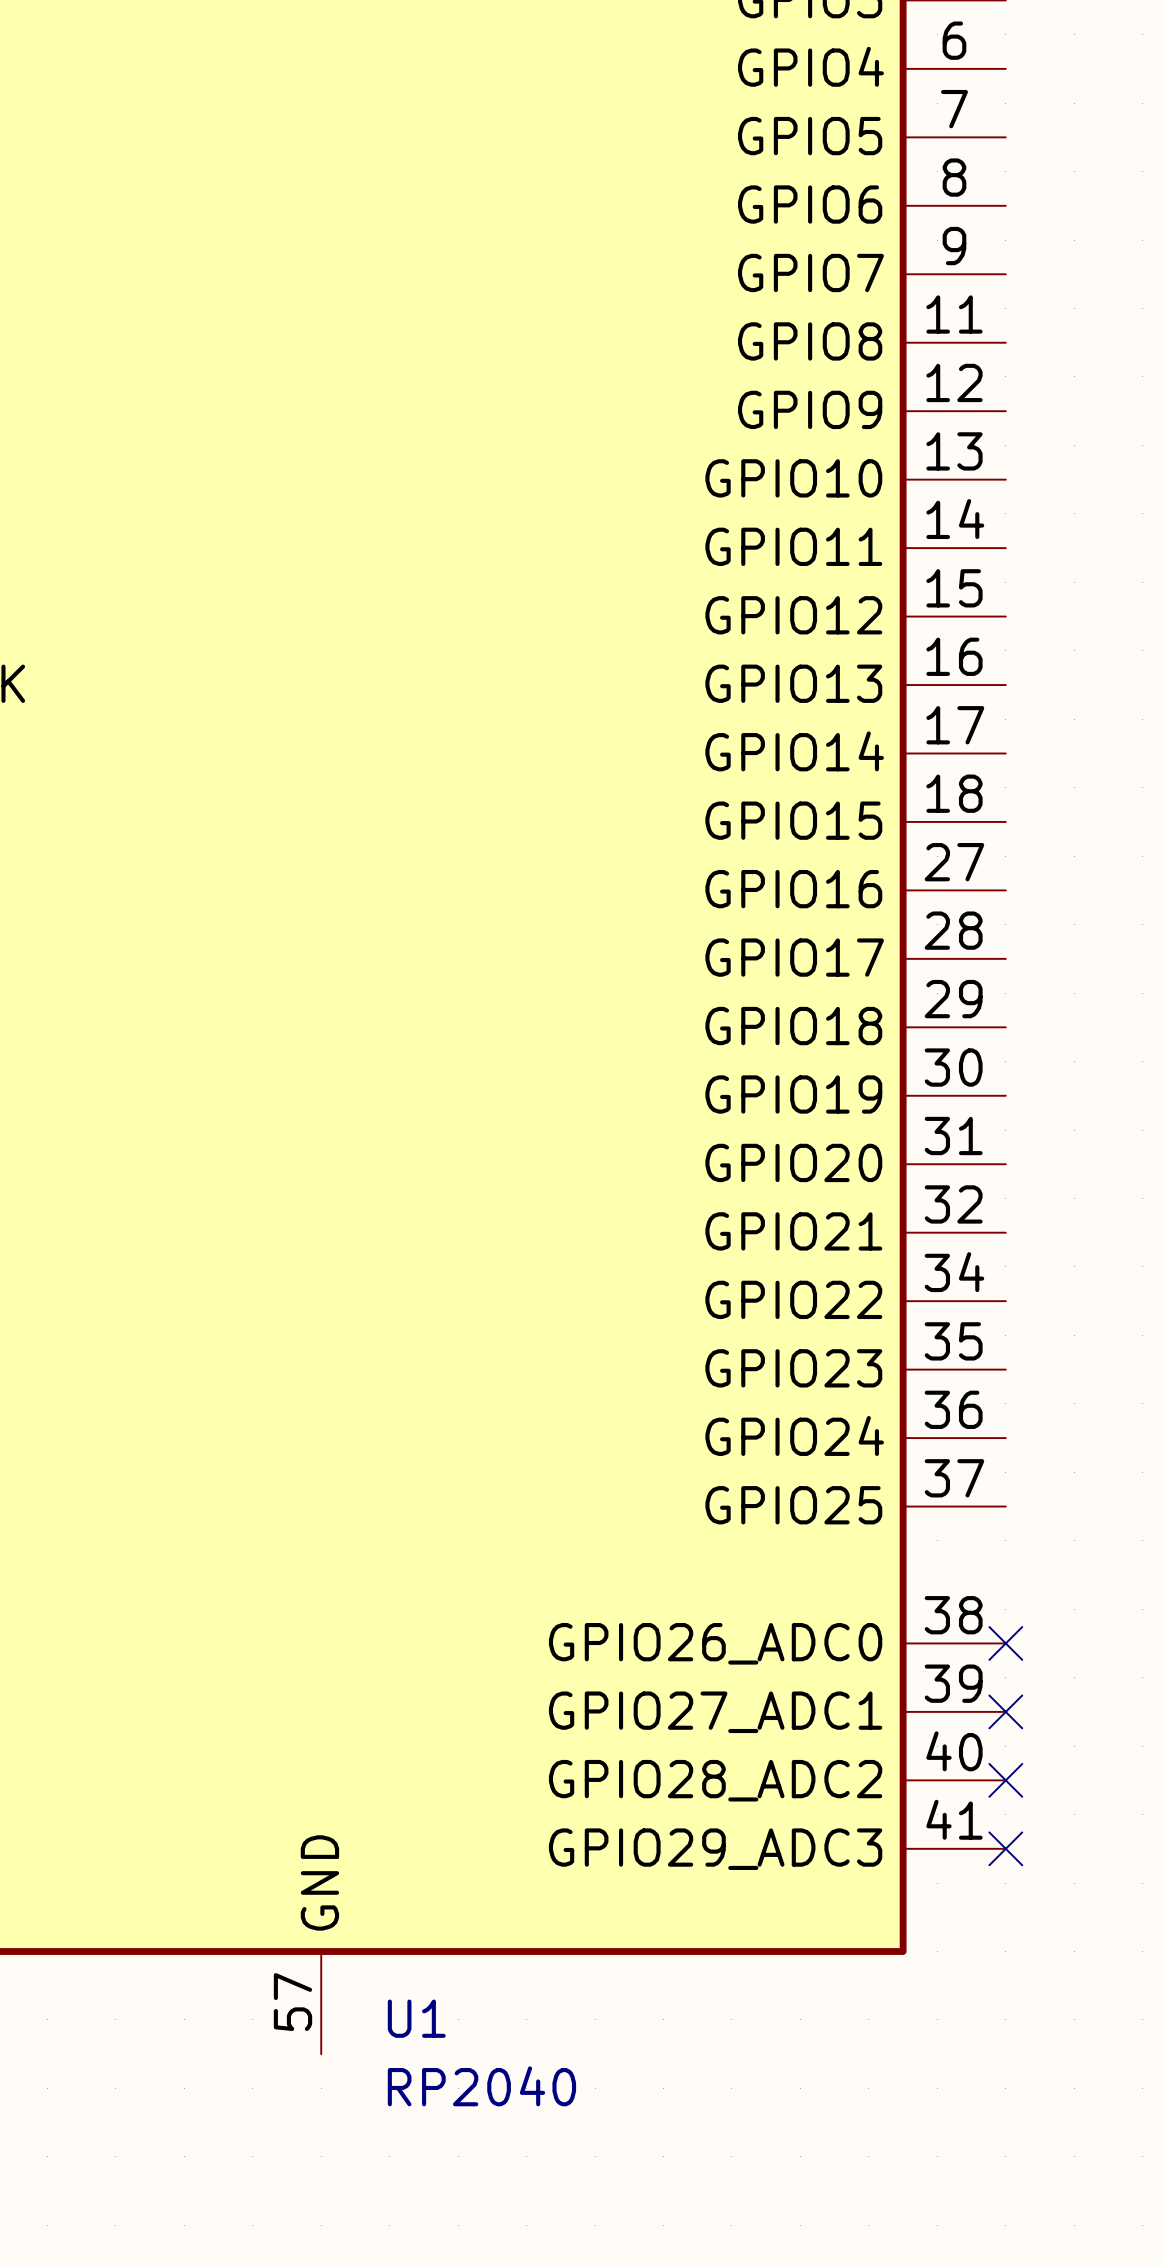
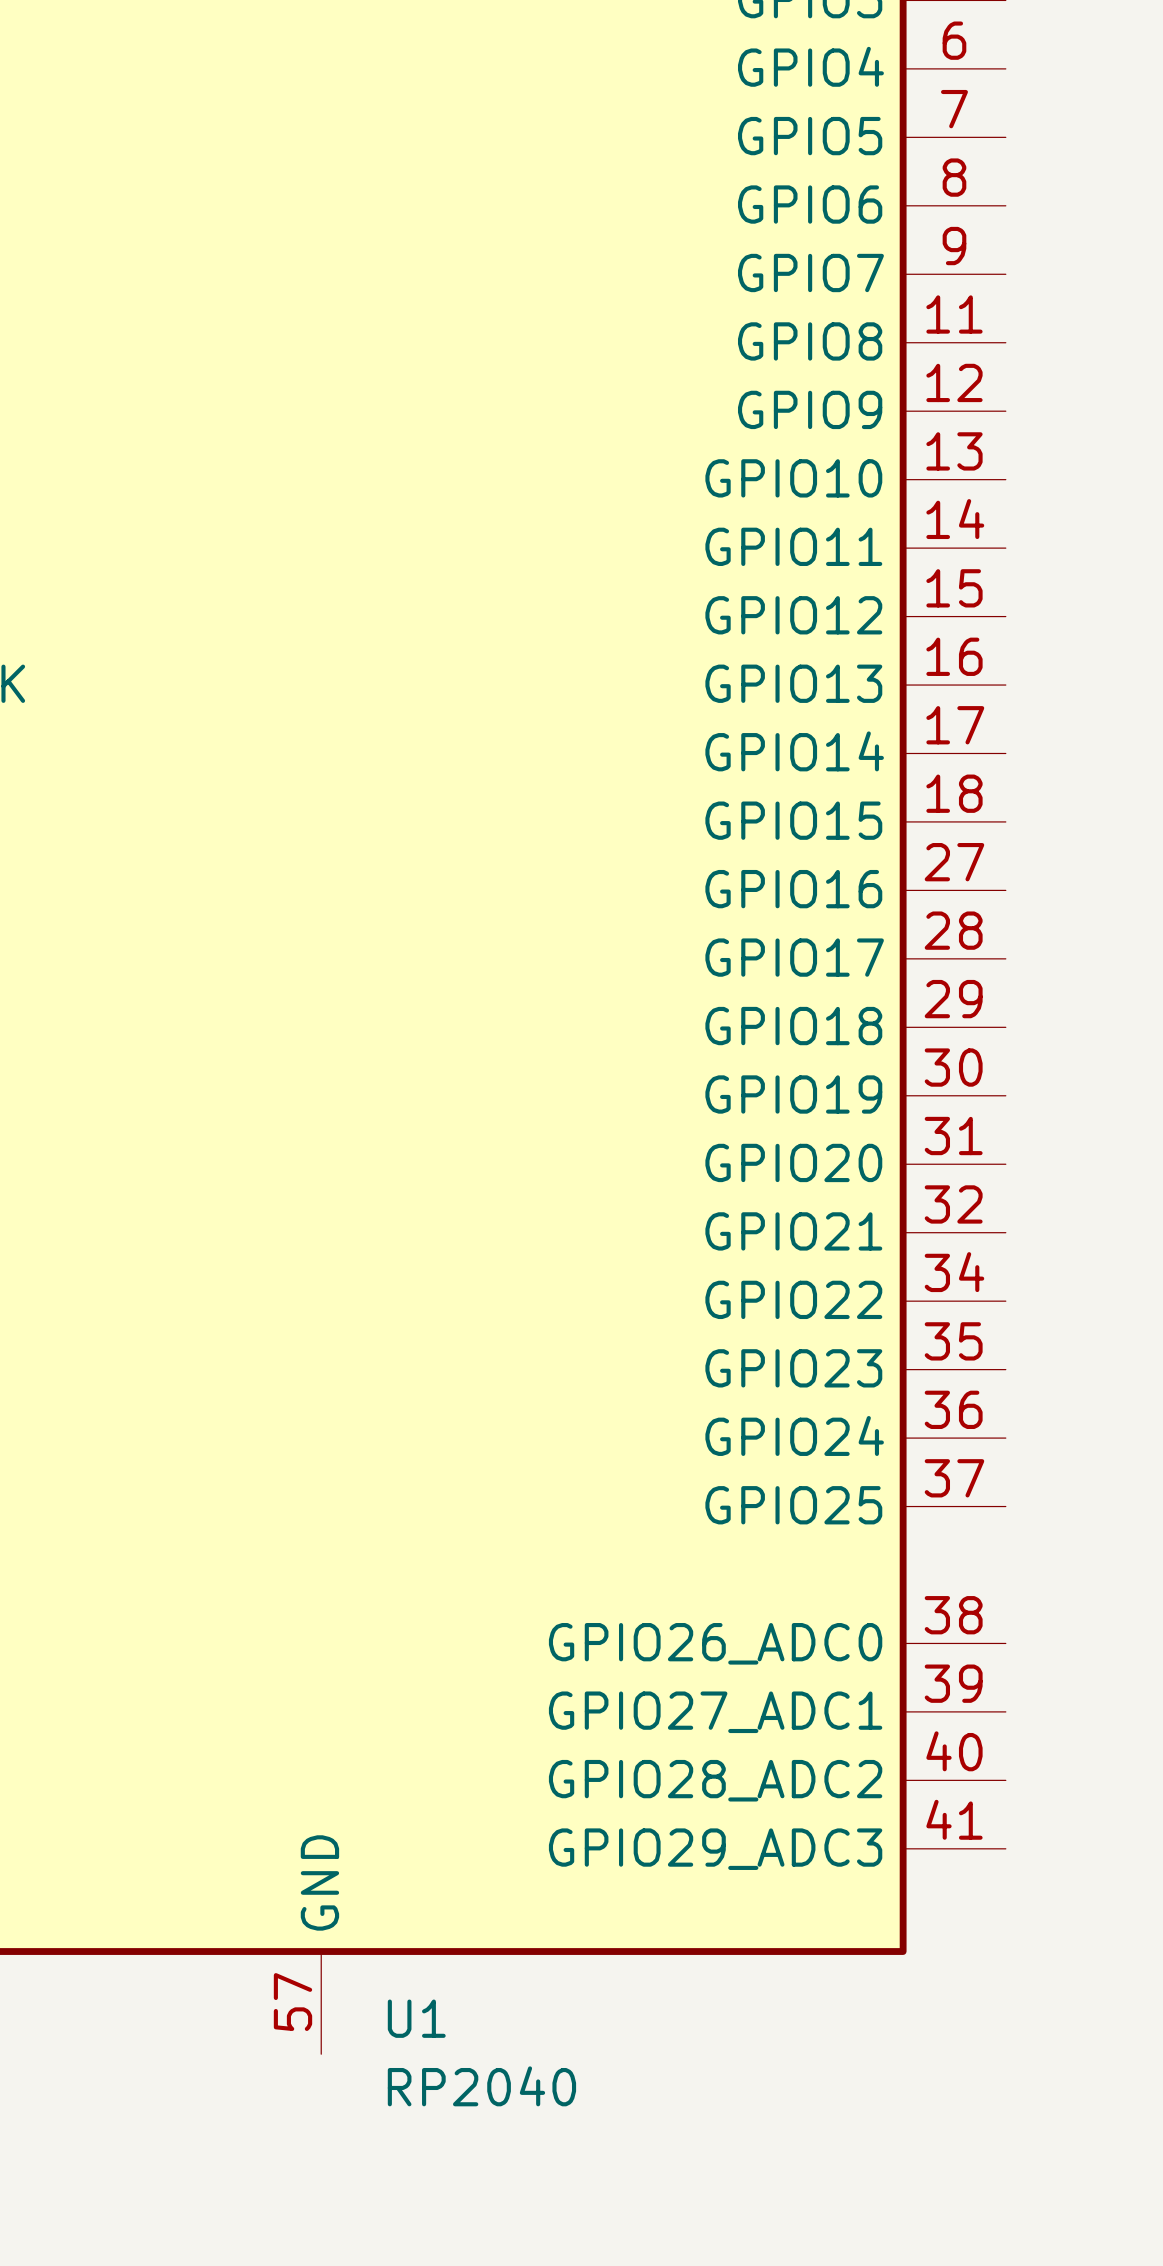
no-connect mark: (1005, 1643) -> none
no-connect mark: (1005, 1711) -> none
no-connect mark: (1005, 1780) -> none
no-connect mark: (1005, 1848) -> none

